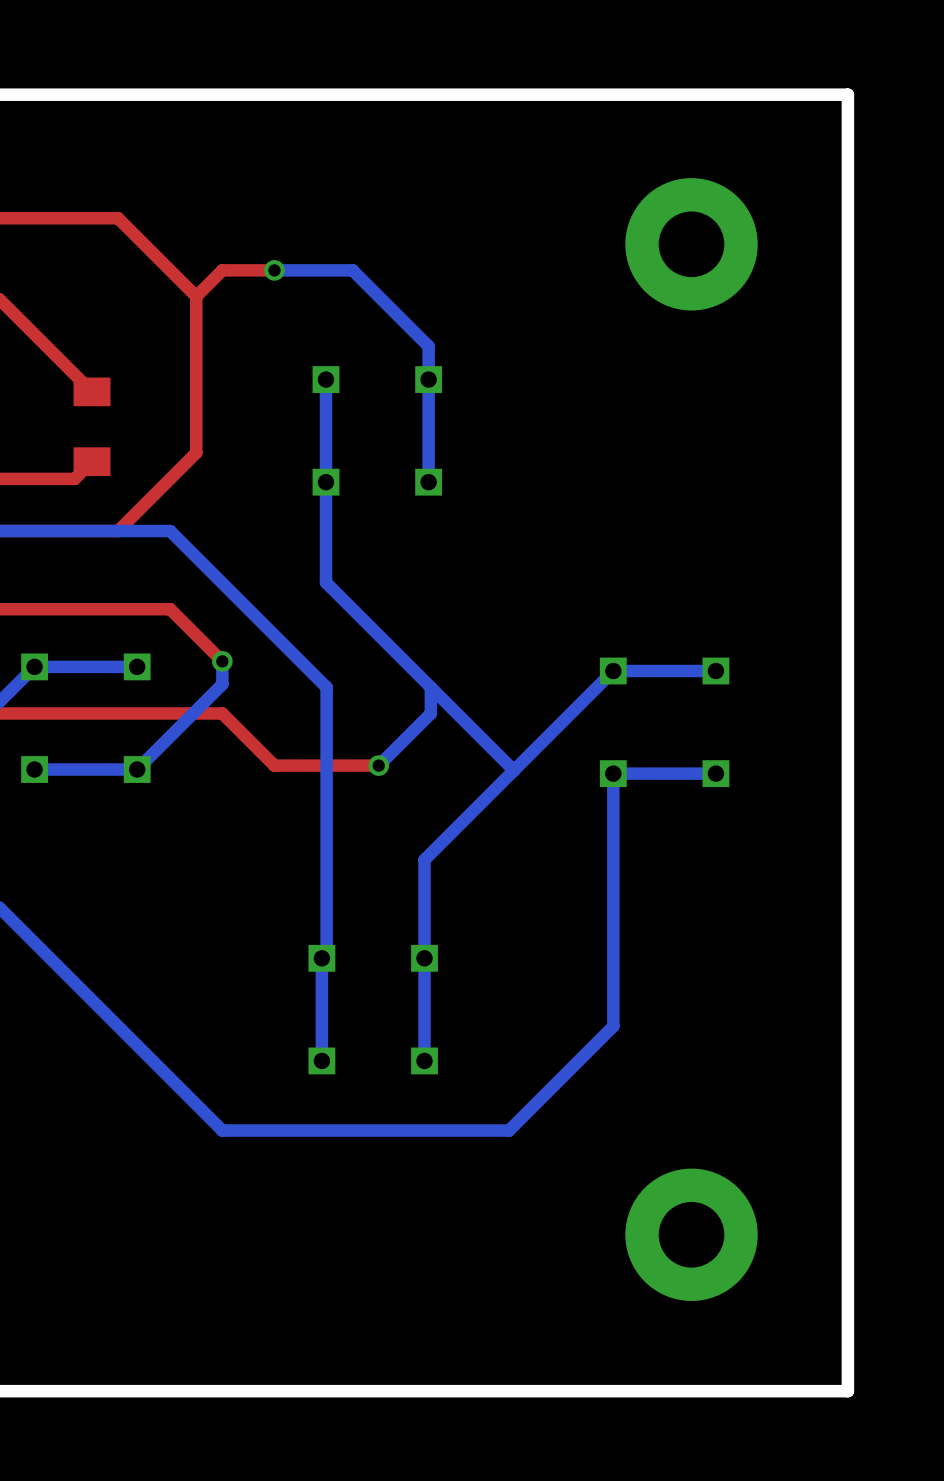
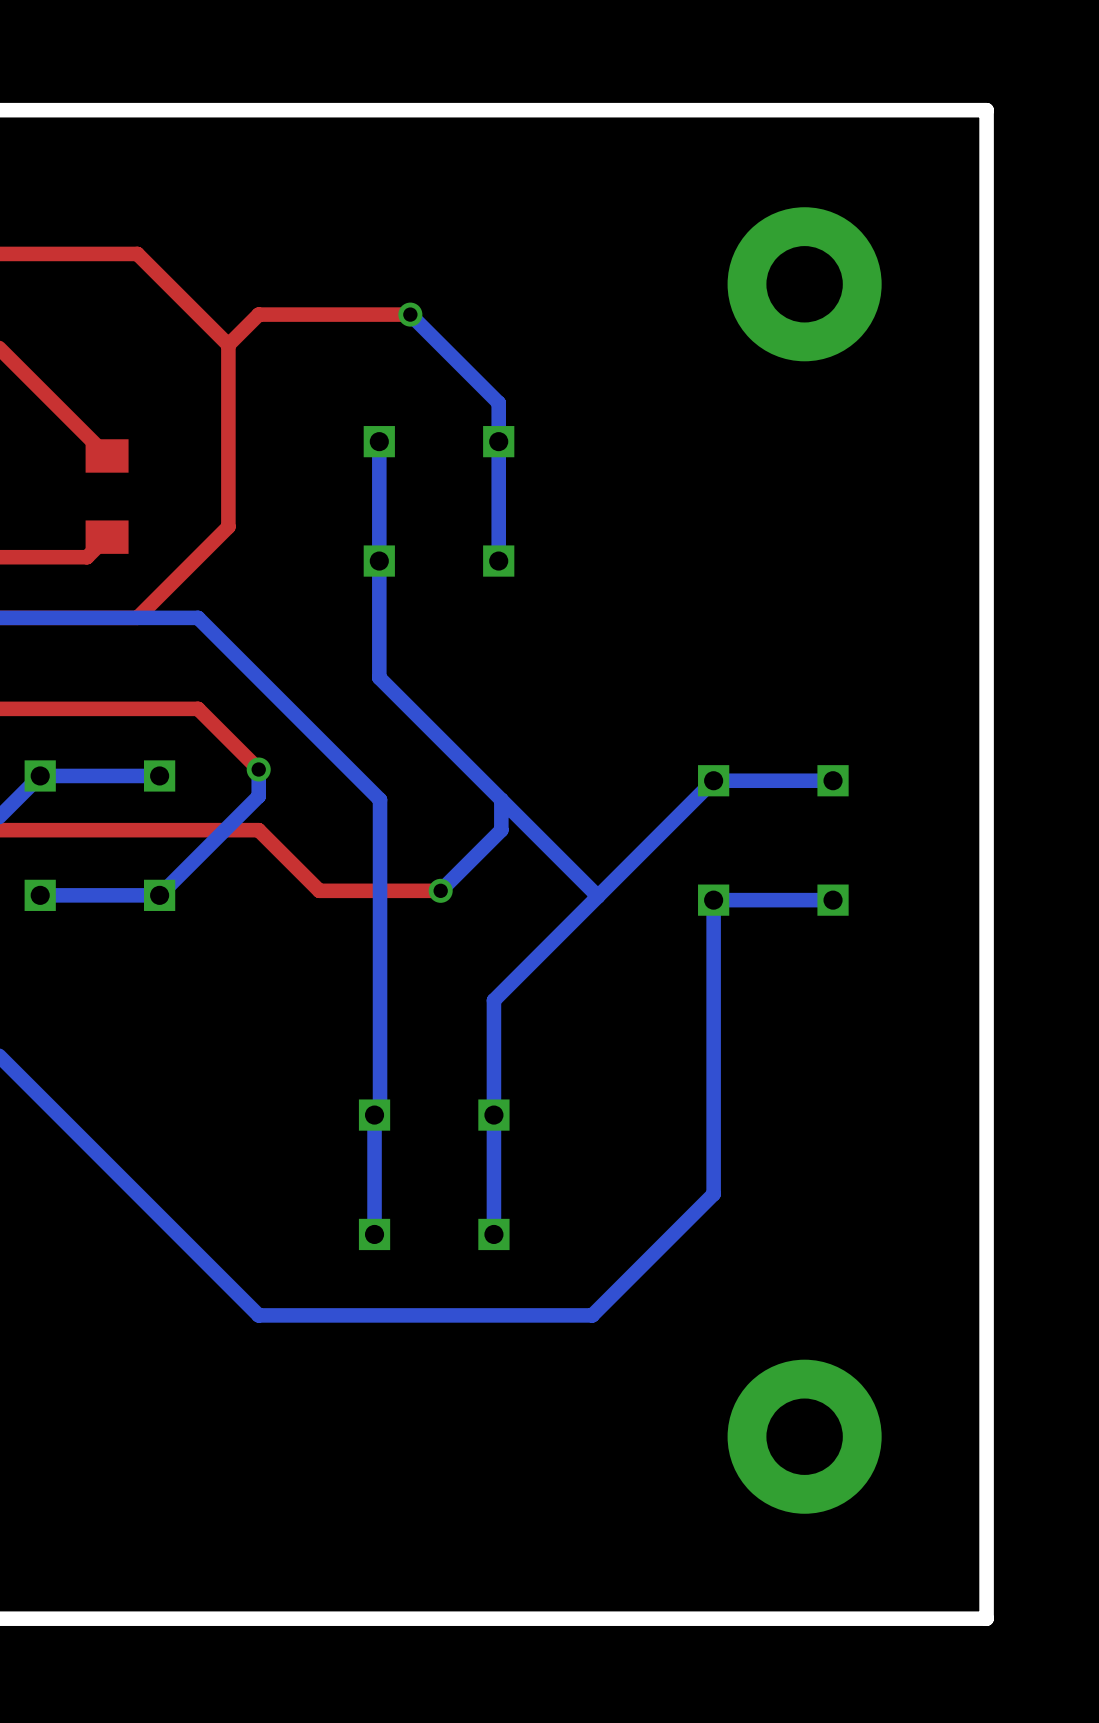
via position: (274, 270) -> (410, 314)
bottom track: (352, 270) (274, 270) -> none
top track: none -> (410, 314) (319, 314)

